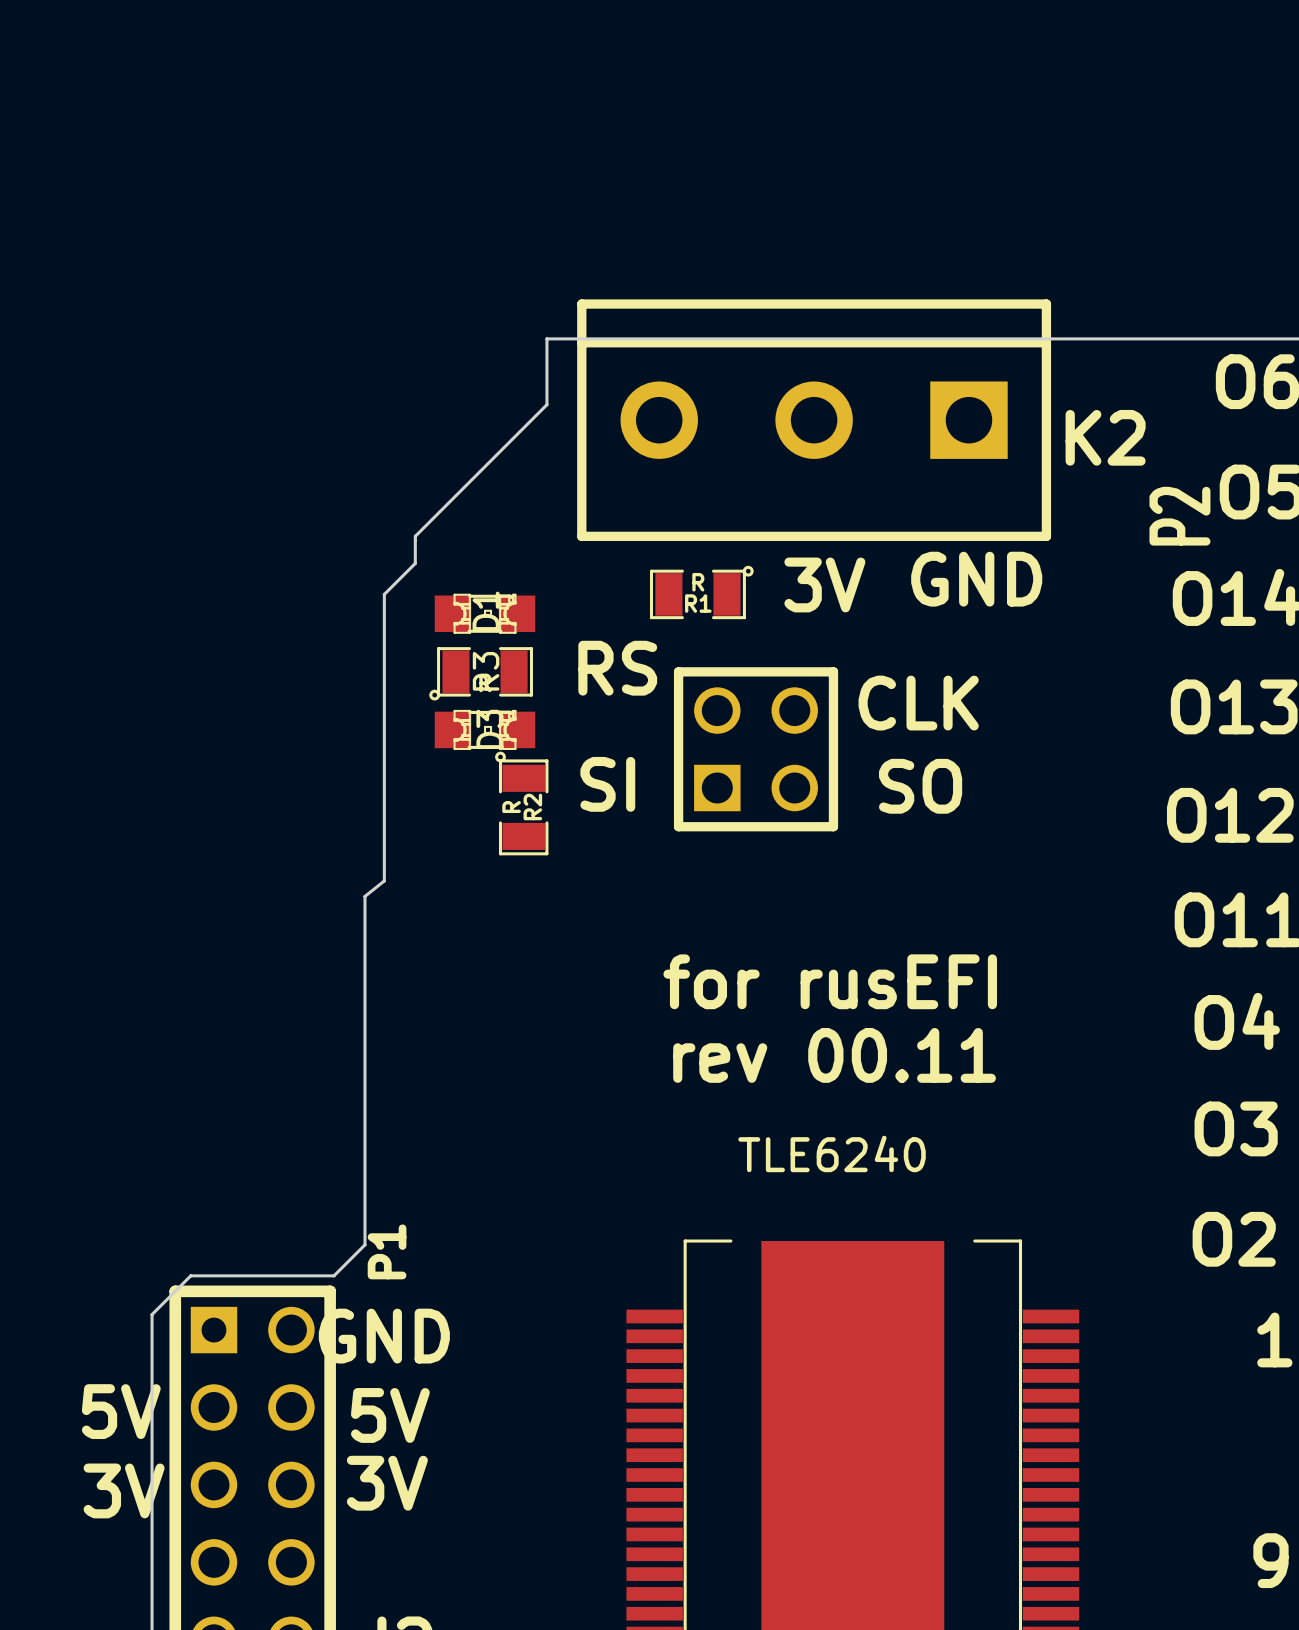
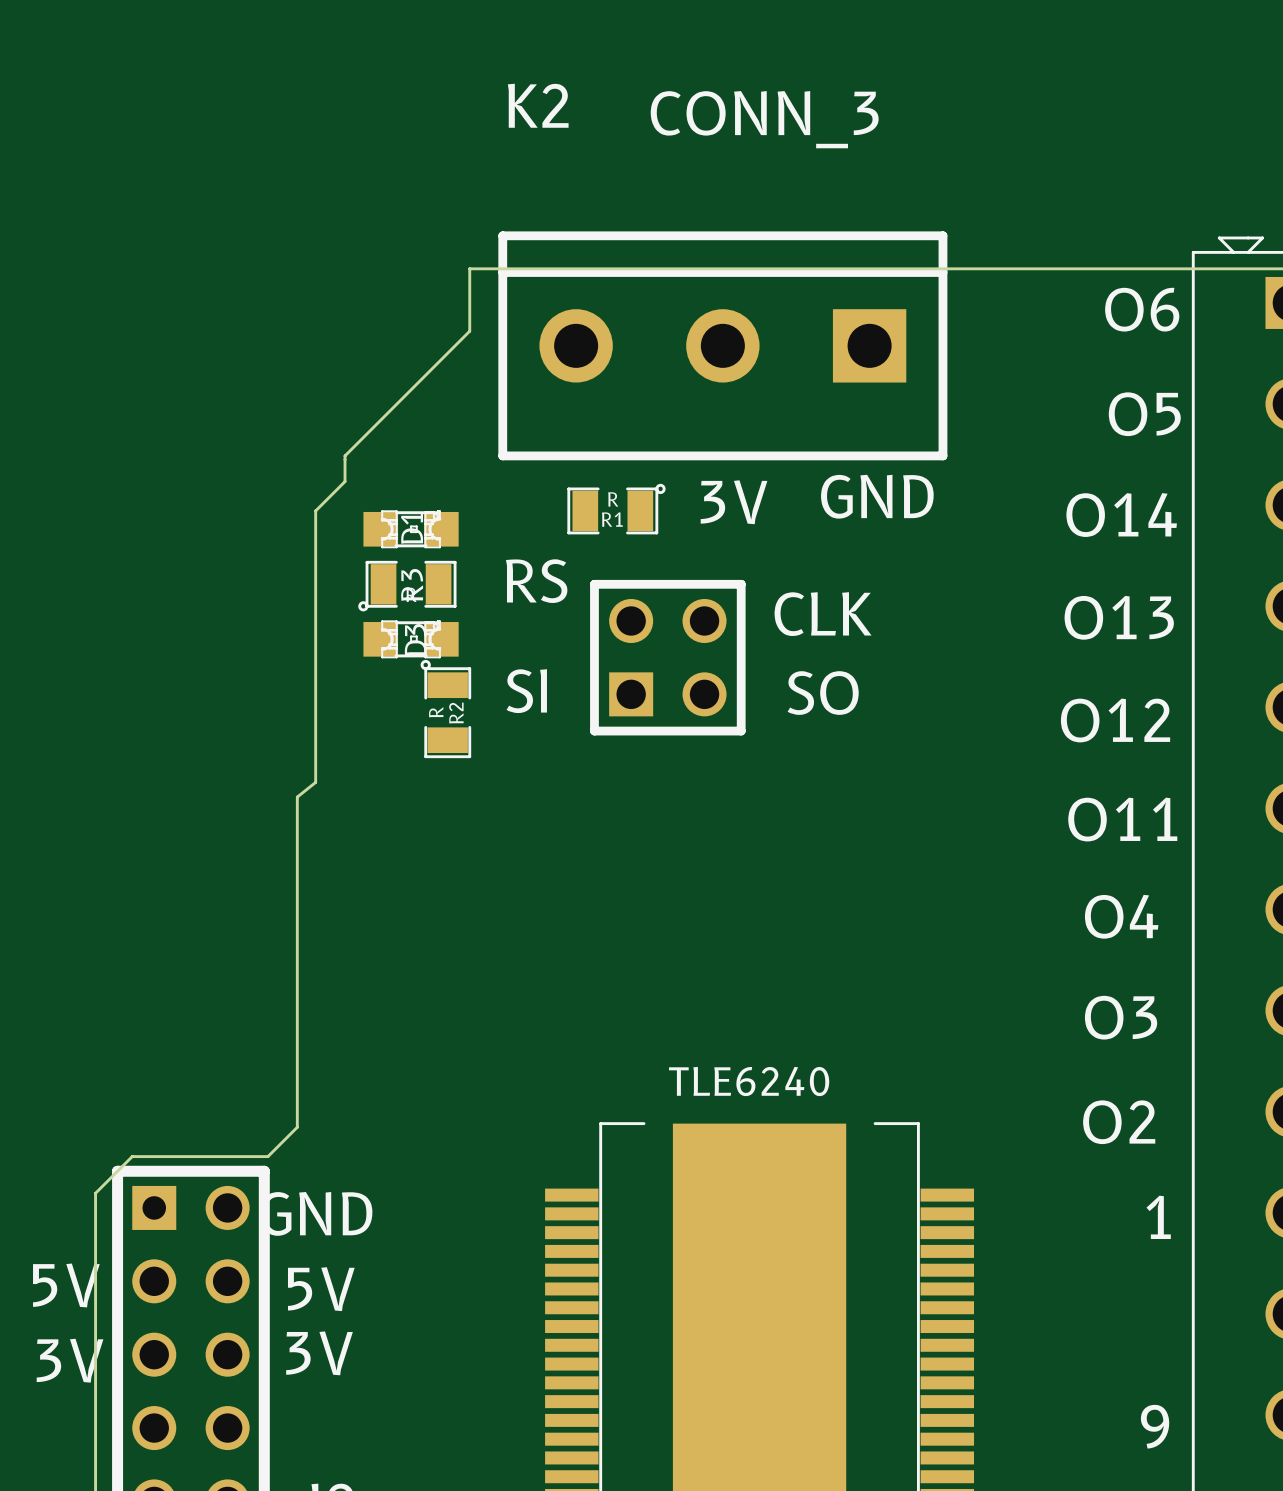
K2 value: none -> CONN_3 (764, 119)
K2 name position: K2 (1105, 437) -> K2 (538, 105)
P2 name: P2 (1179, 516) -> none
text: for rusEFI (830, 981) -> none
text: rev 00.11 (834, 1055) -> none
part value position: TLE6240 (832, 1153) -> TLE6240 (749, 1081)
P1 name: P1 (387, 1251) -> none

